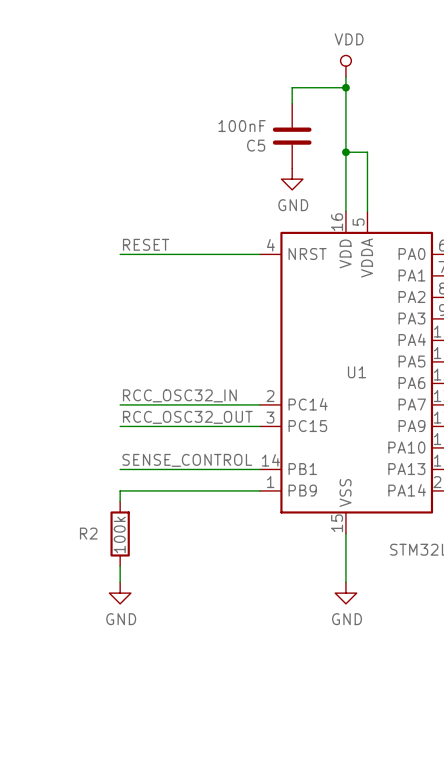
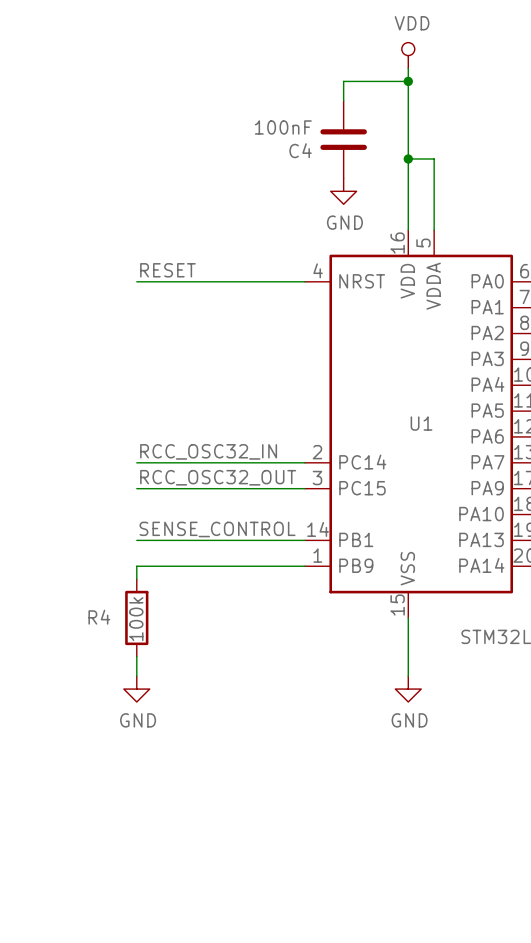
C5 name: C5 (256, 145) -> C4 (300, 150)
R2 name: R2 (88, 533) -> R4 (99, 617)

